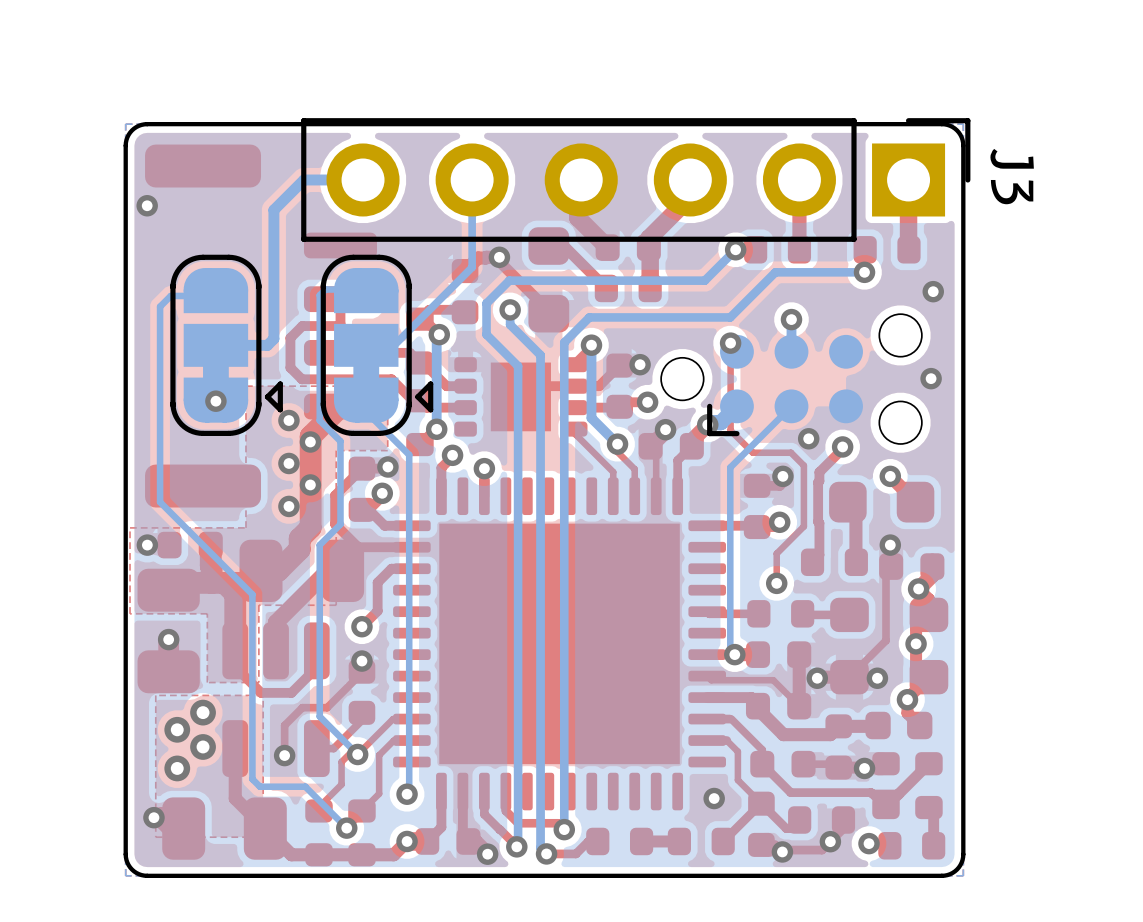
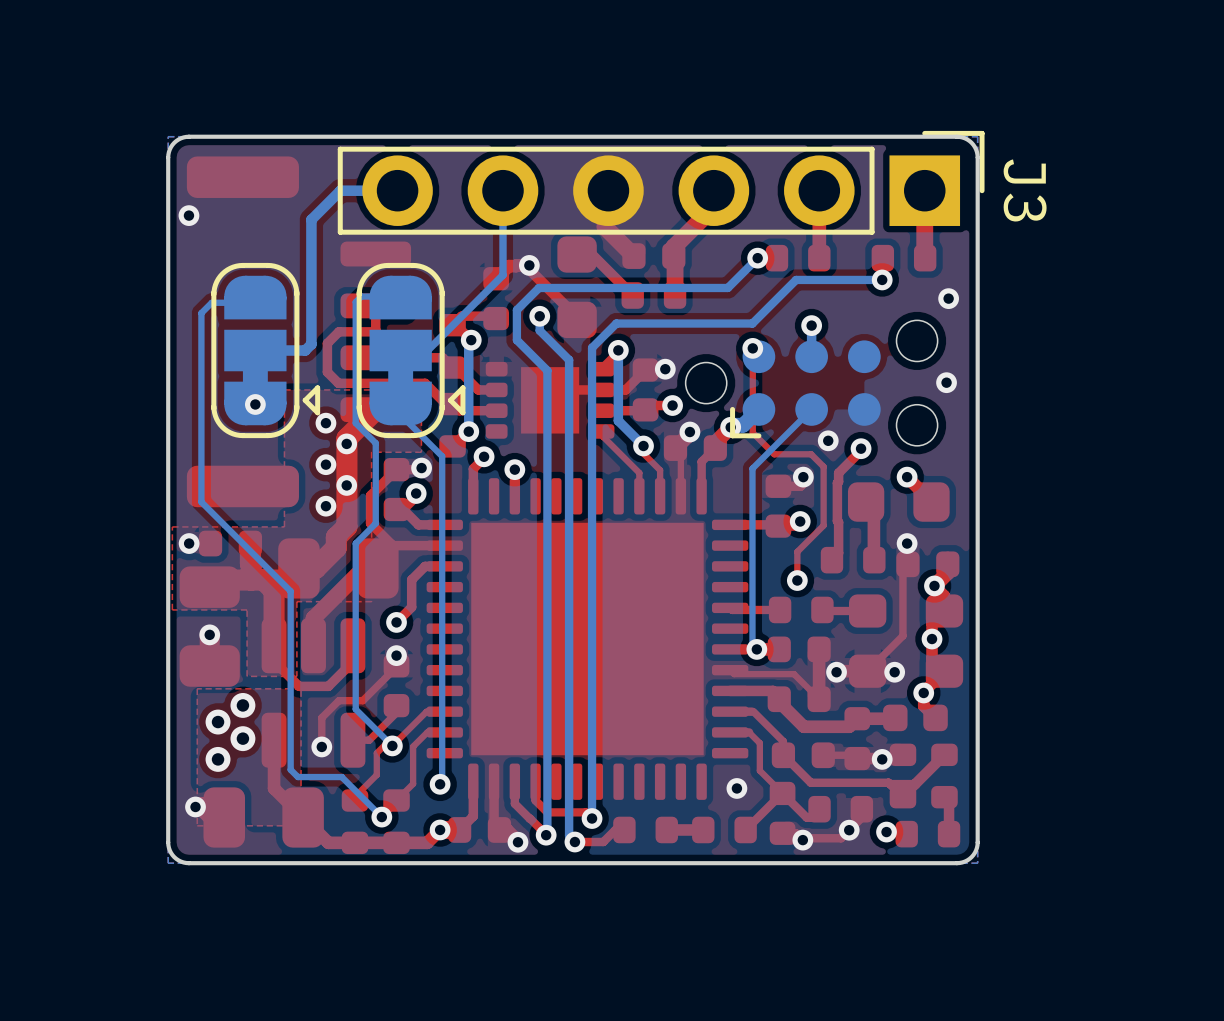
J3 footprint: [301, 118, 971, 242] -> [337, 130, 985, 235]

